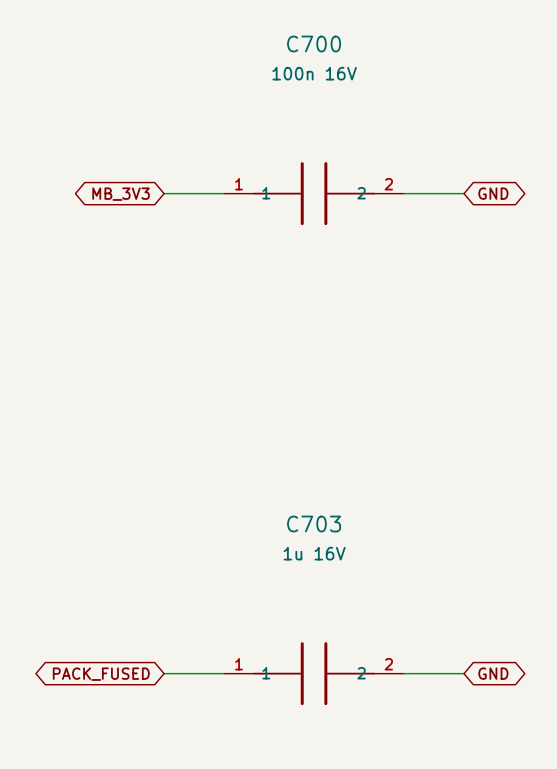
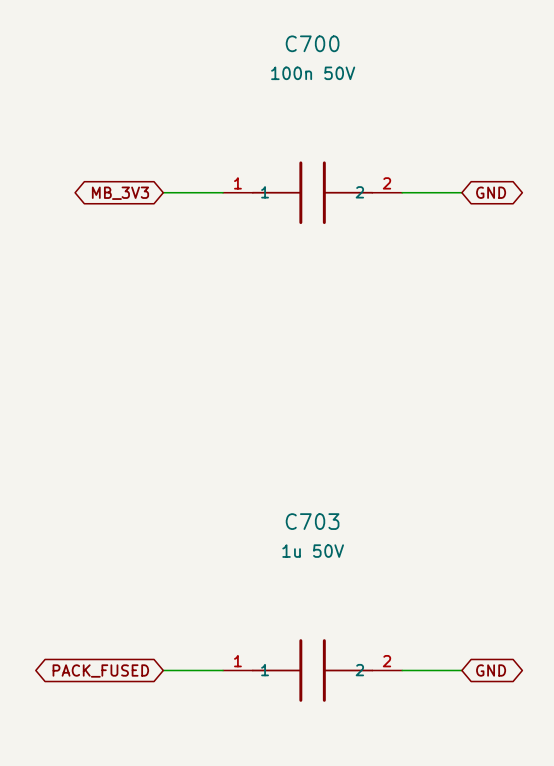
C700 value: 100n 16V (314, 73) -> 100n 50V (313, 73)
C703 value: 1u 16V (314, 553) -> 1u 50V (313, 551)

